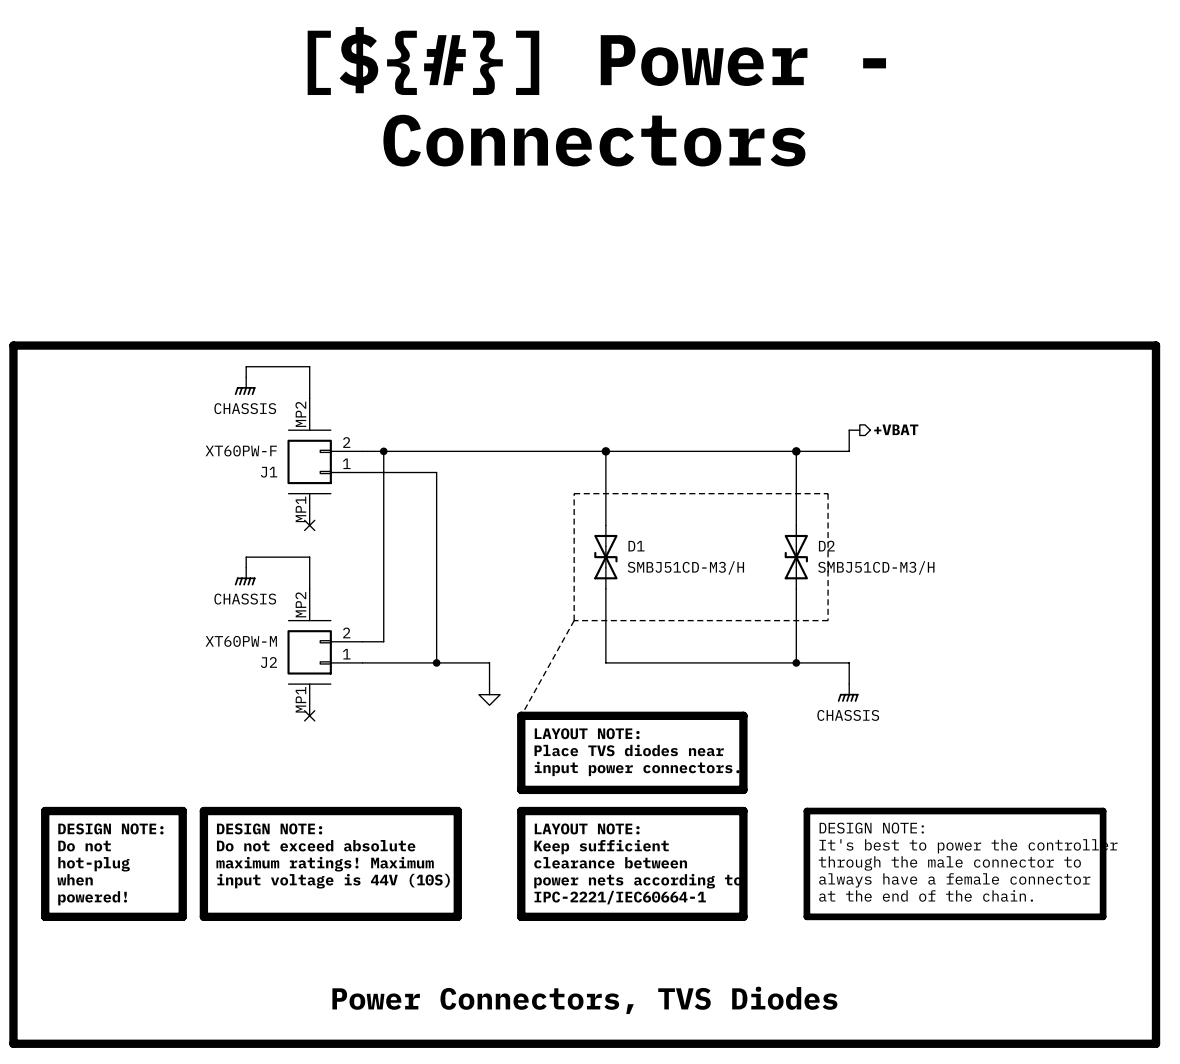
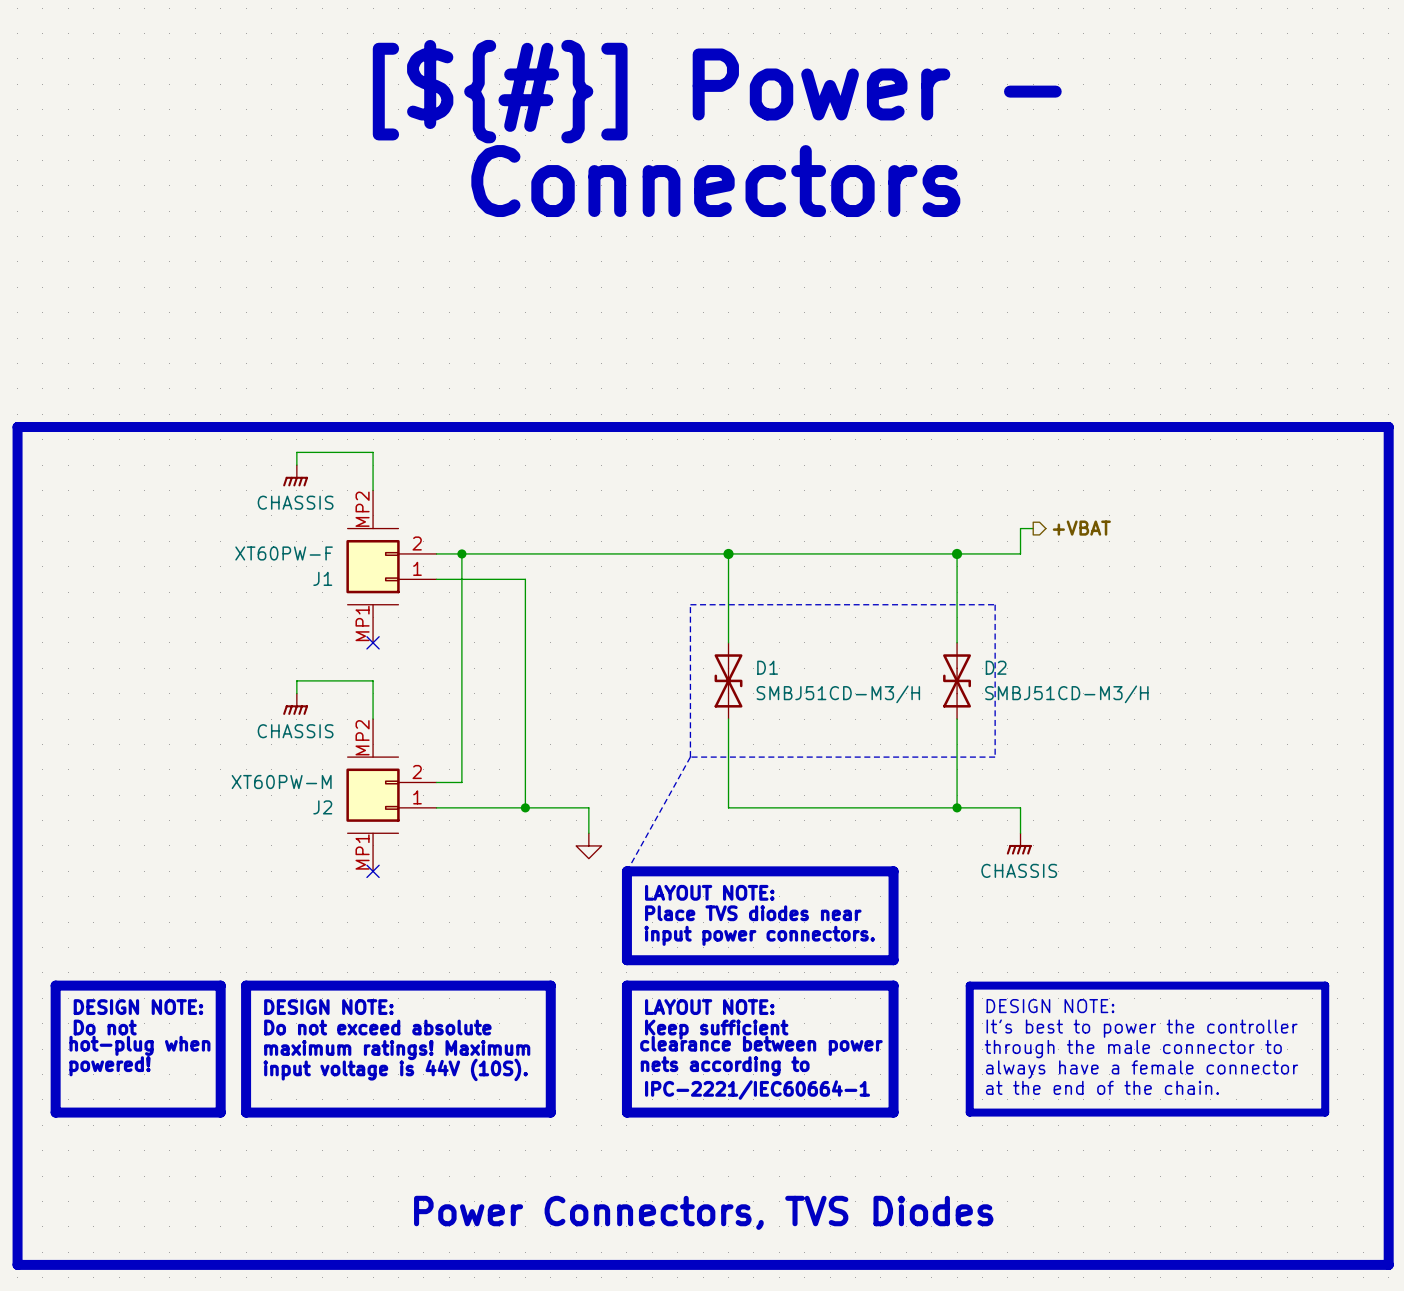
text: clearance between (610, 862) -> clearance between power (761, 1045)
text: hot-plug (94, 864) -> hot-plug when (139, 1045)
text: when (75, 879) -> powered! (110, 1066)
text: power nets according to (638, 881) -> nets according to (725, 1066)
text: powered! (92, 898) -> none

